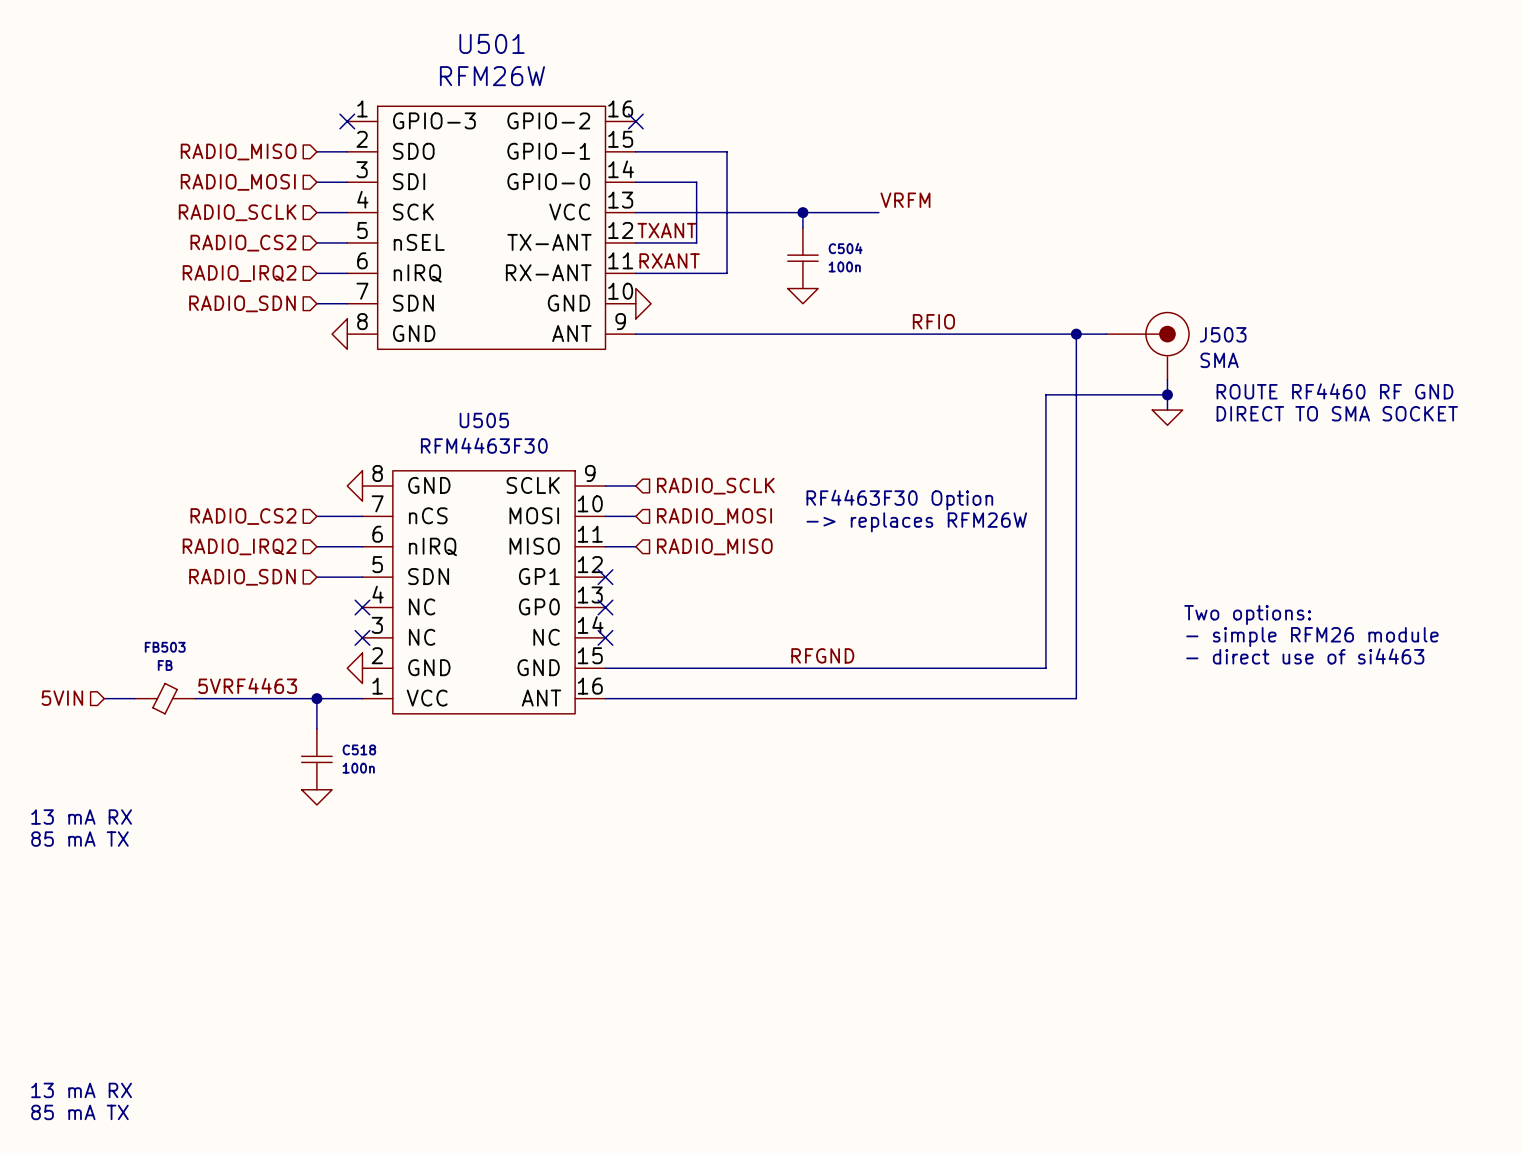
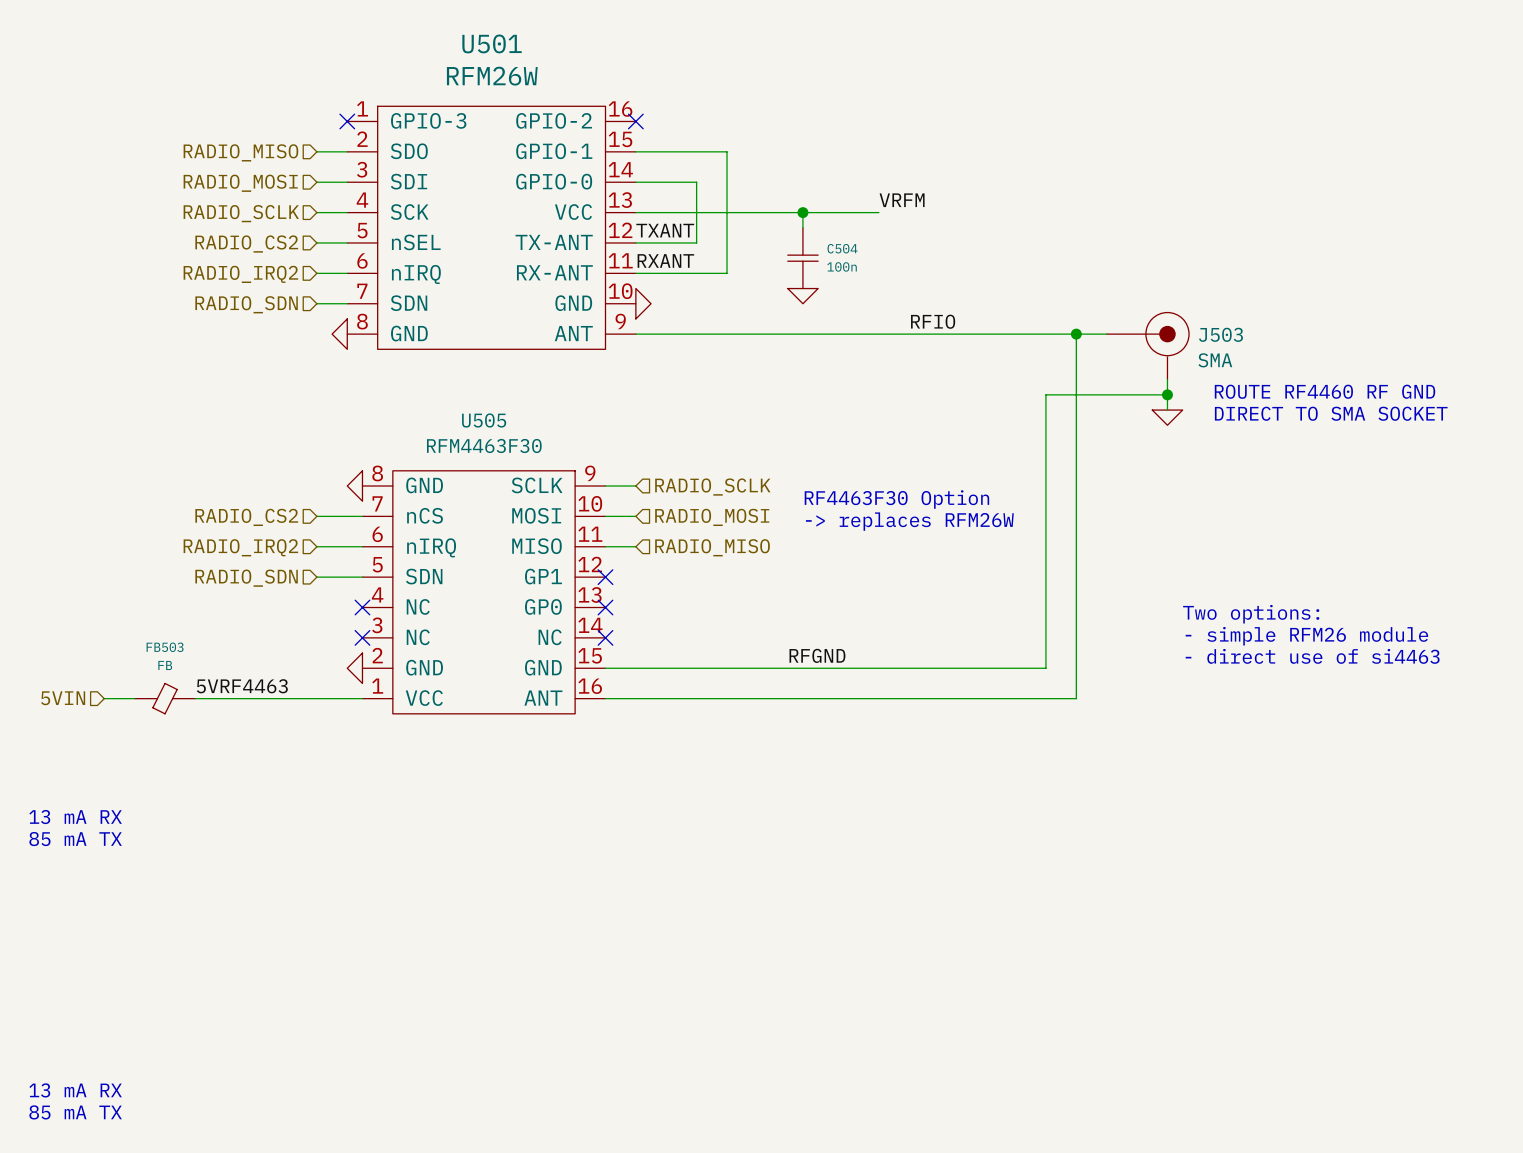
wire: (316, 698) (316, 729) -> none
junction: (316, 698) -> none
C518: 100n (316, 759) -> none
power symbol: (316, 797) -> none

